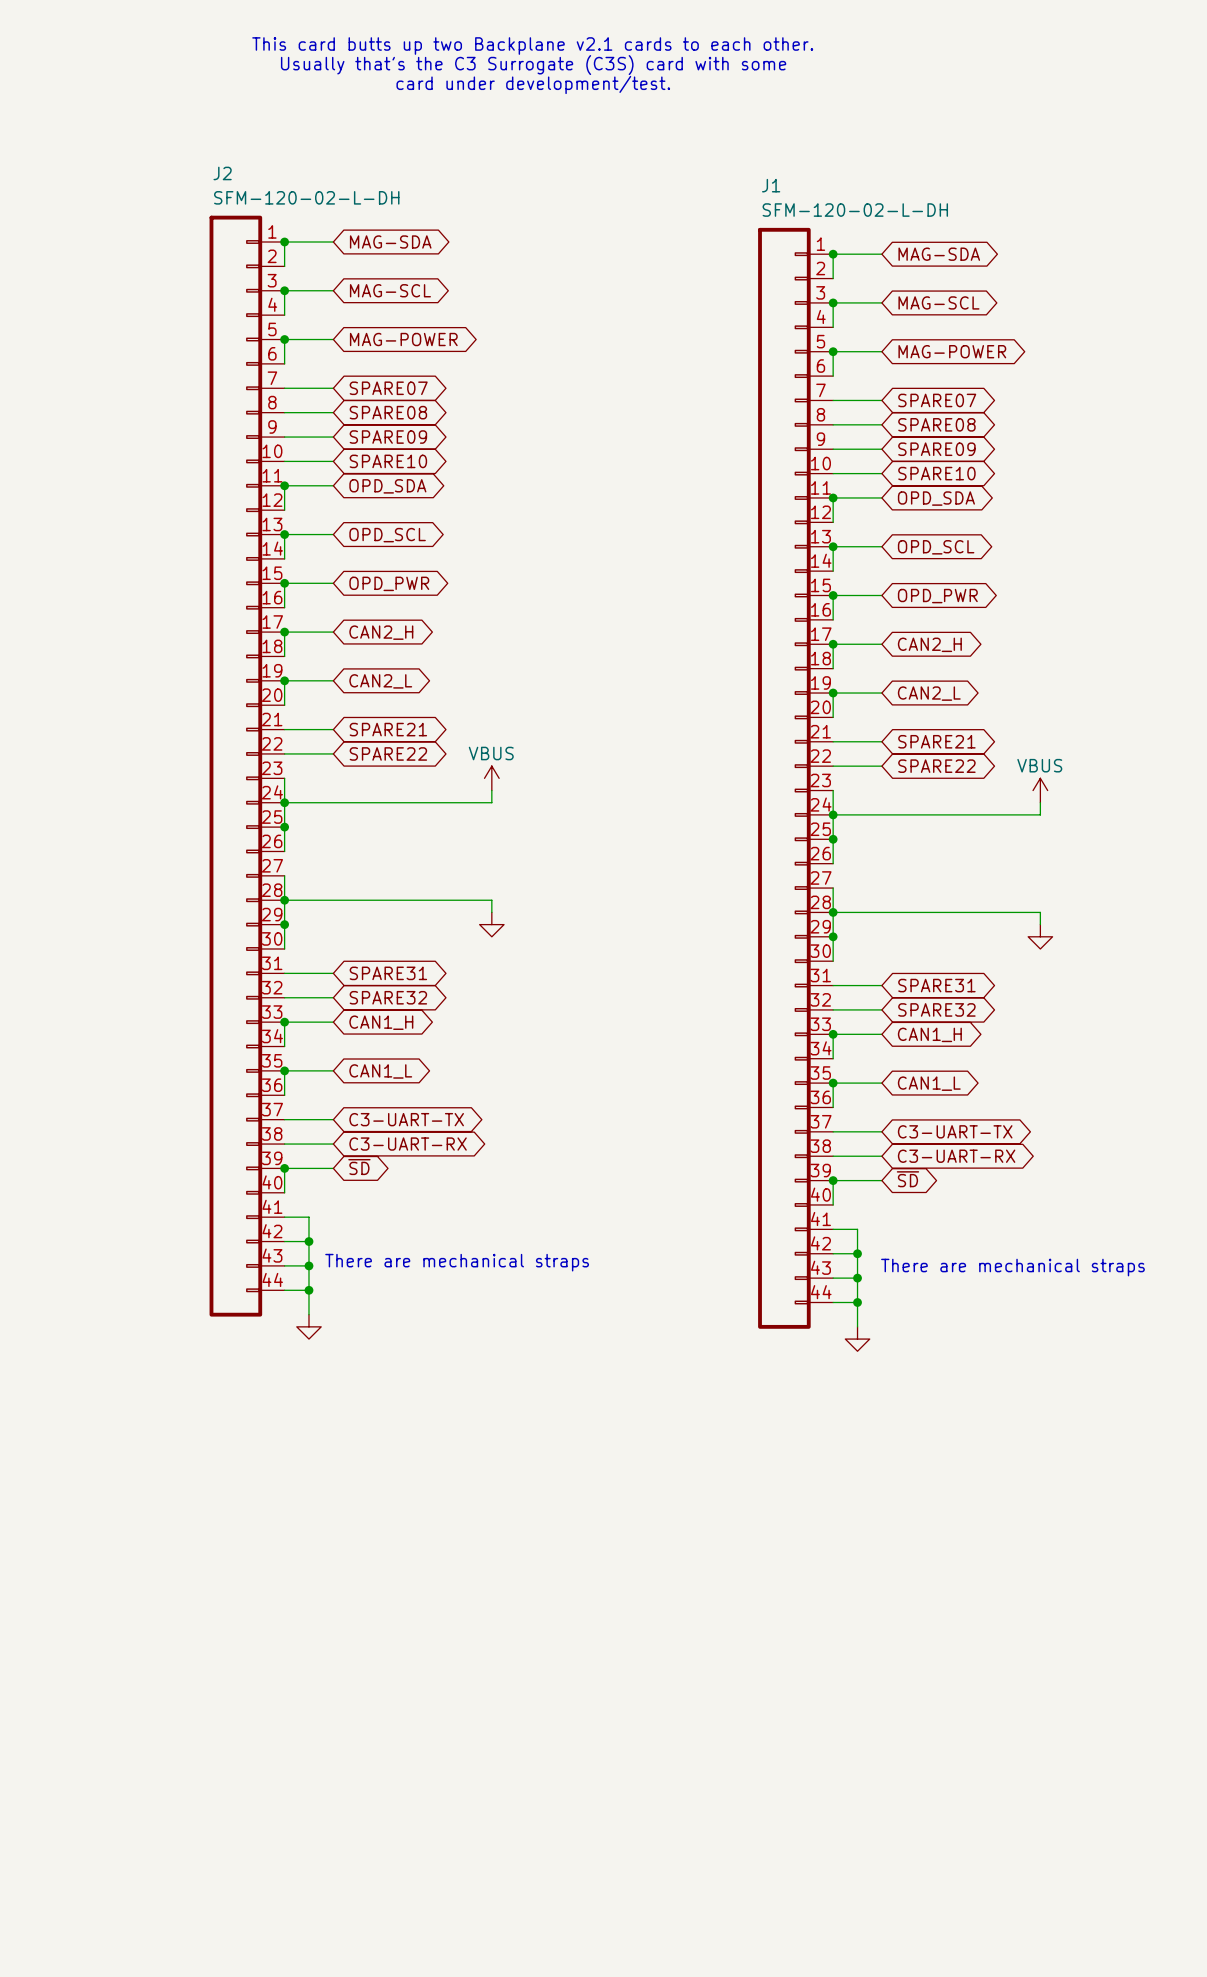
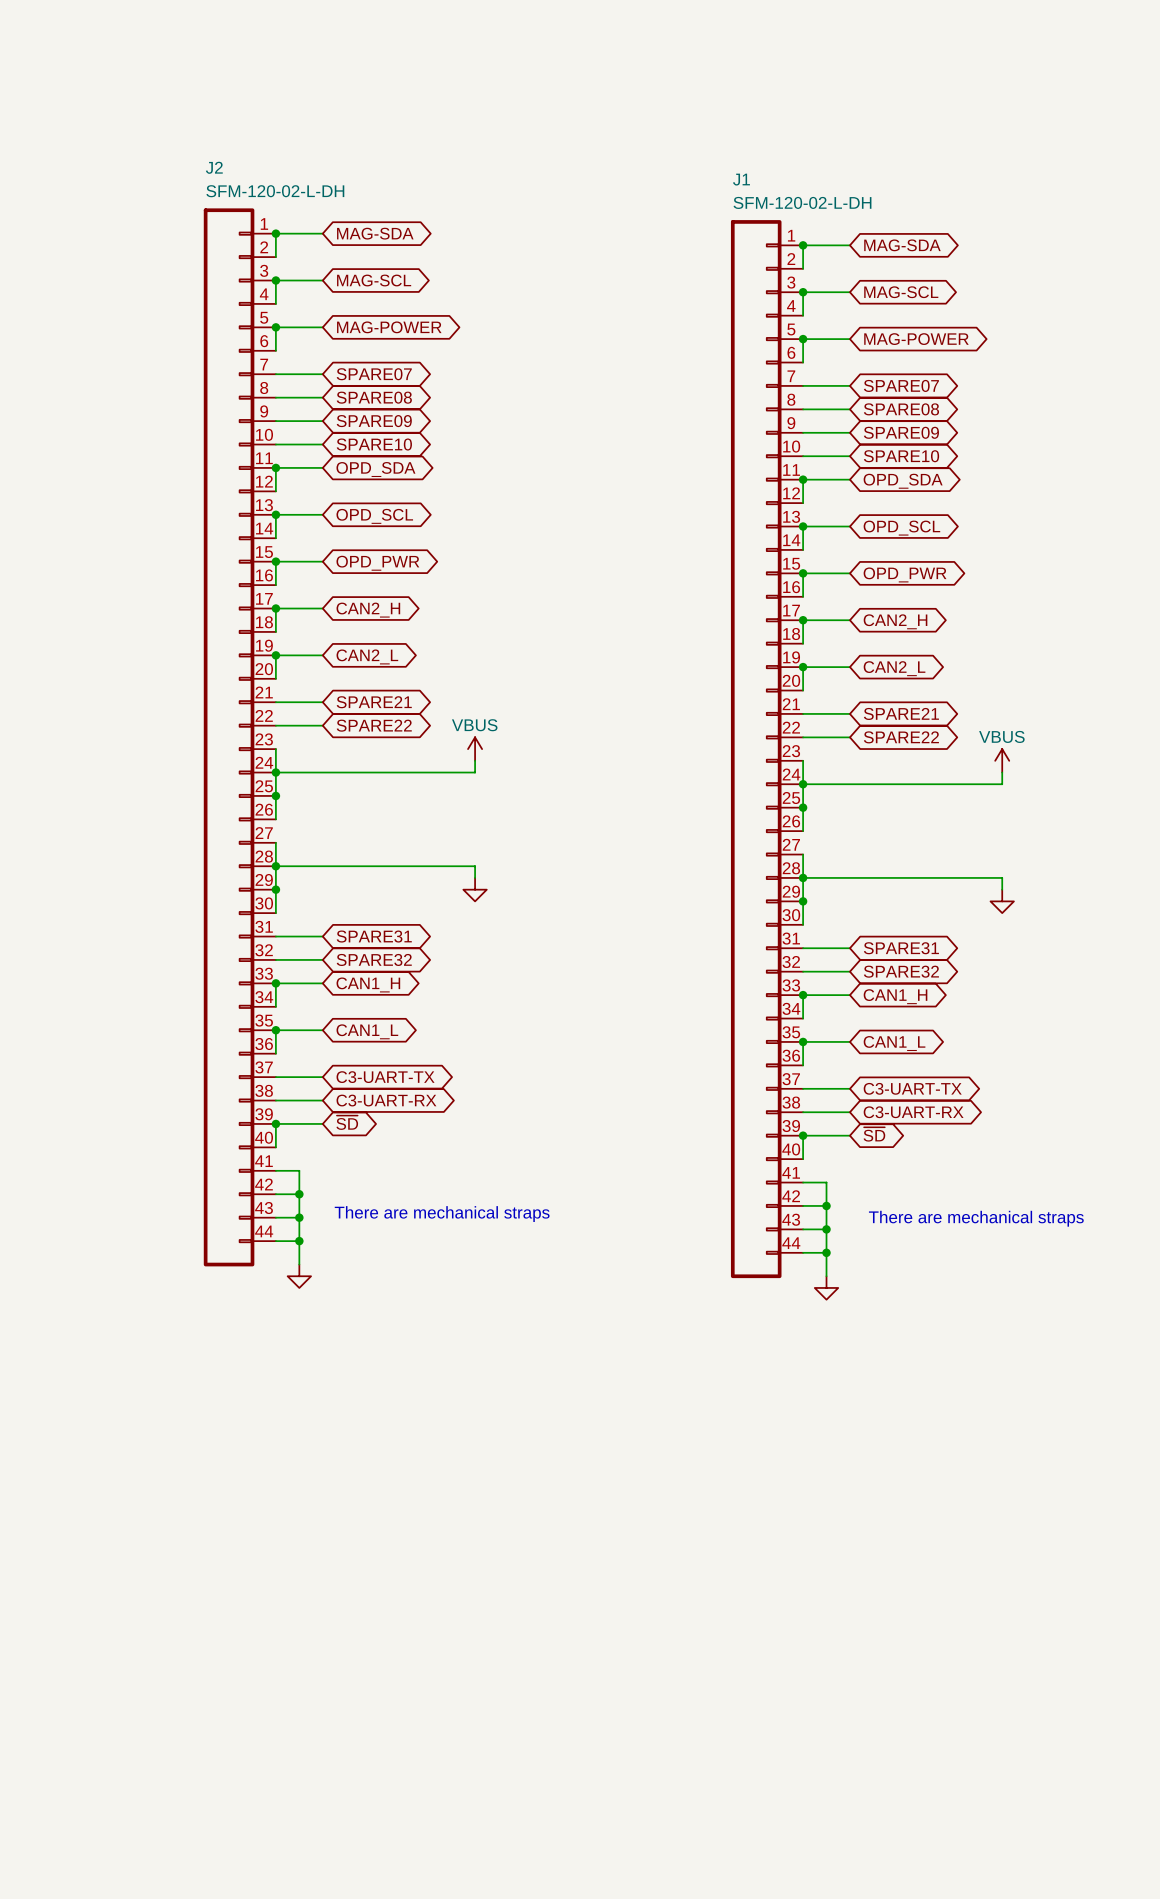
text: This card butts up two Backplane v2.1 cards to each other. (532, 46) -> none
text: Usually that's the C3 Surrogate (C3S) card with some (533, 65) -> none
text: card under development/test. (533, 84) -> none

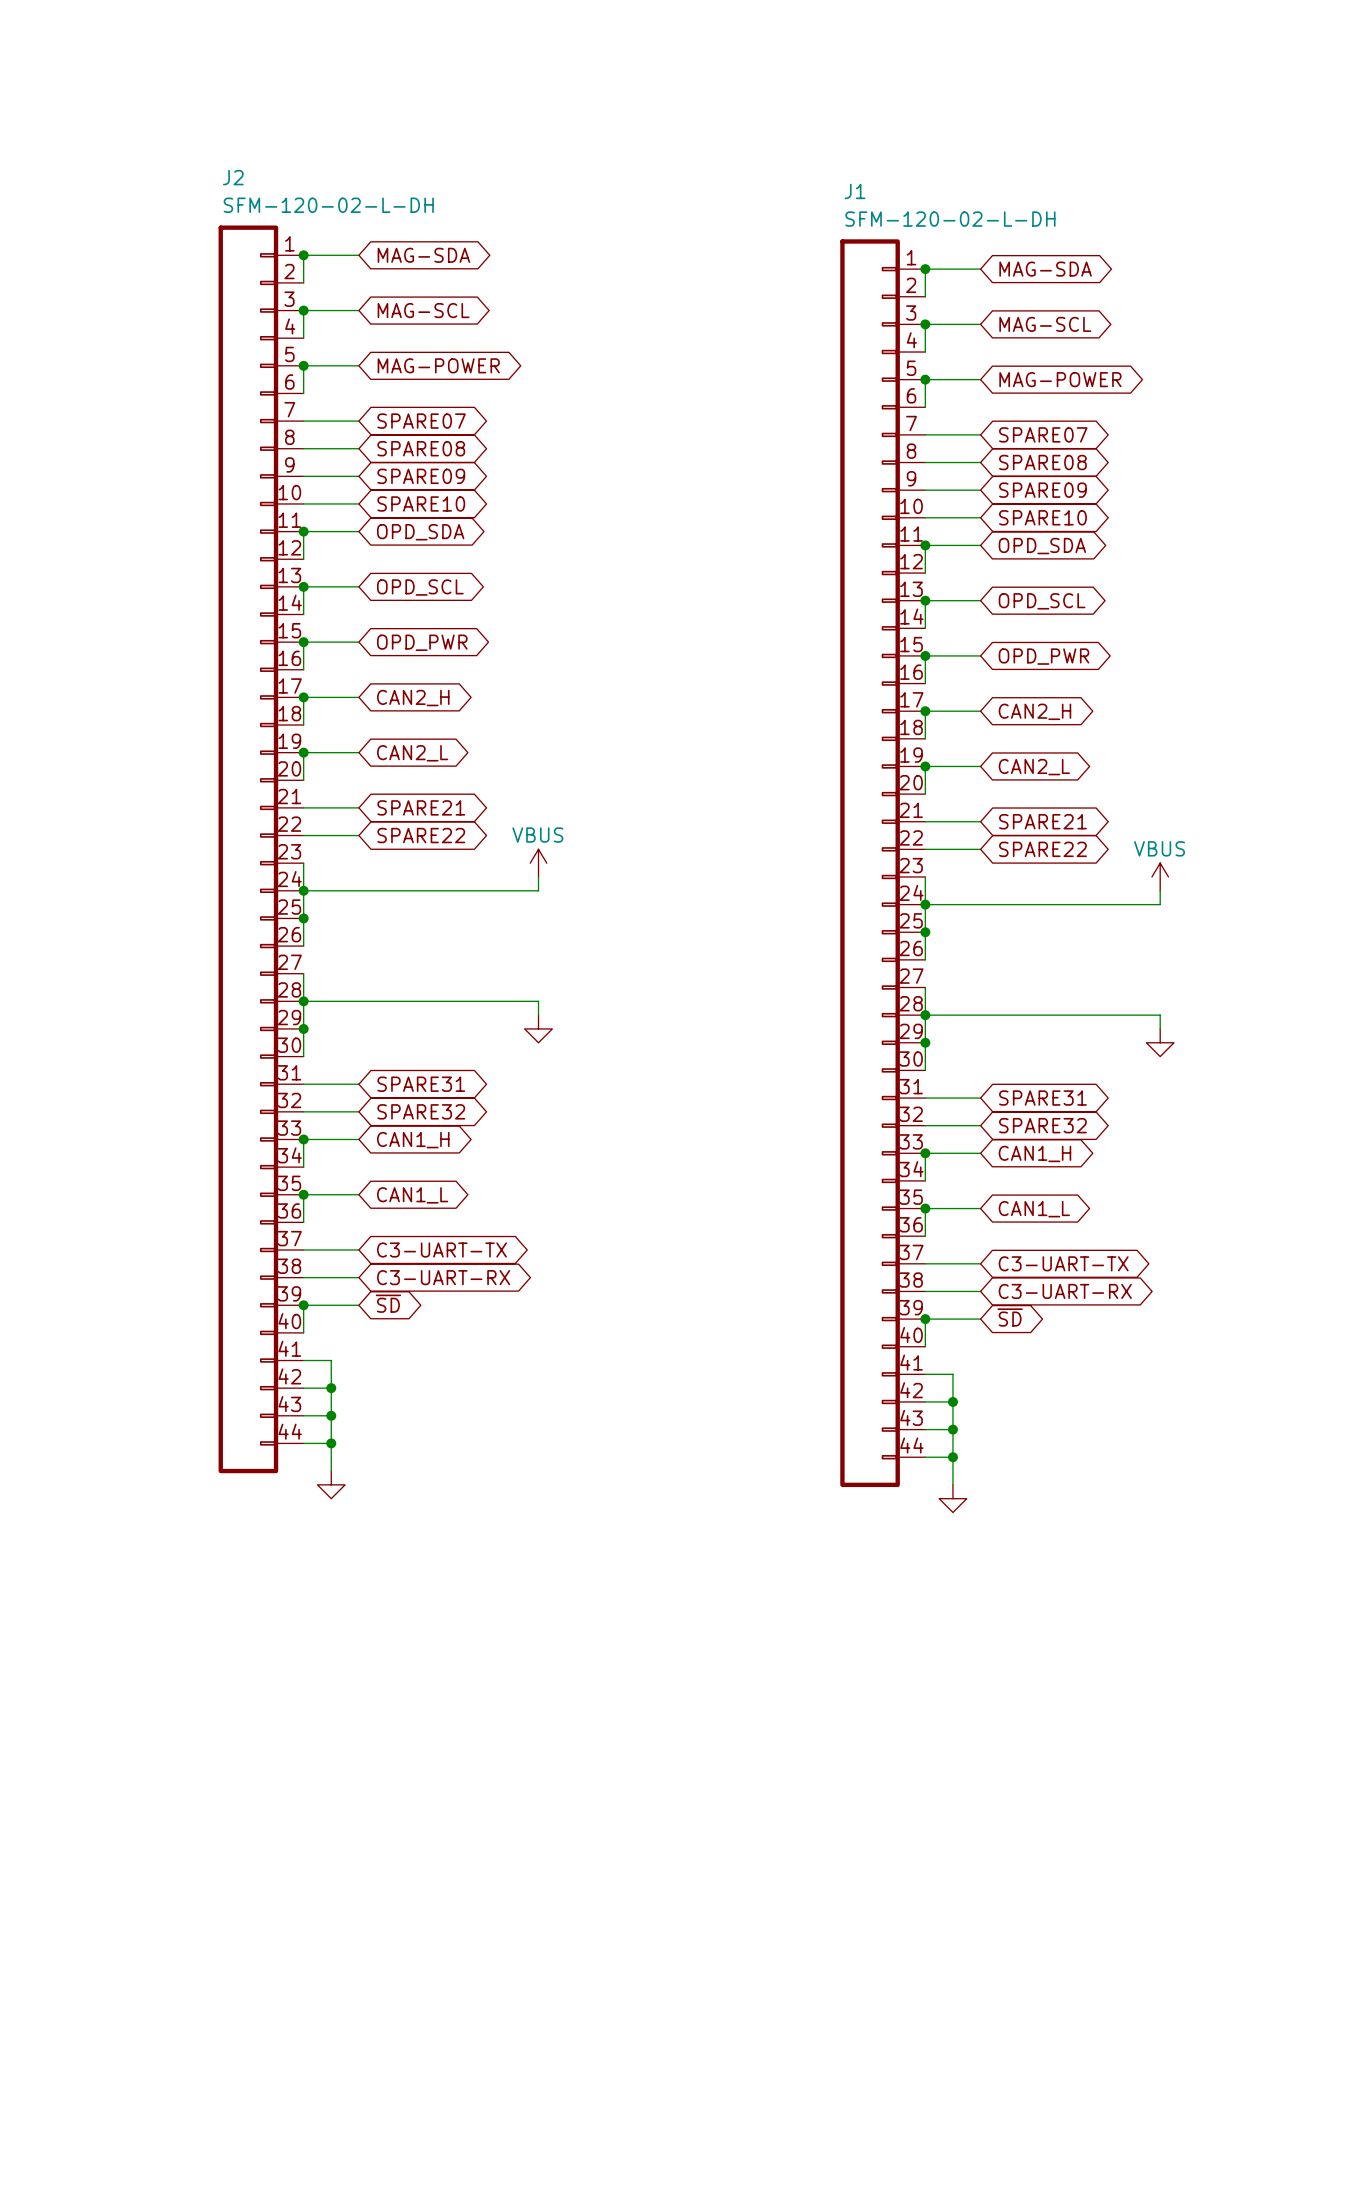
text: There are mechanical straps (442, 1214) -> none
text: There are mechanical straps (976, 1218) -> none

